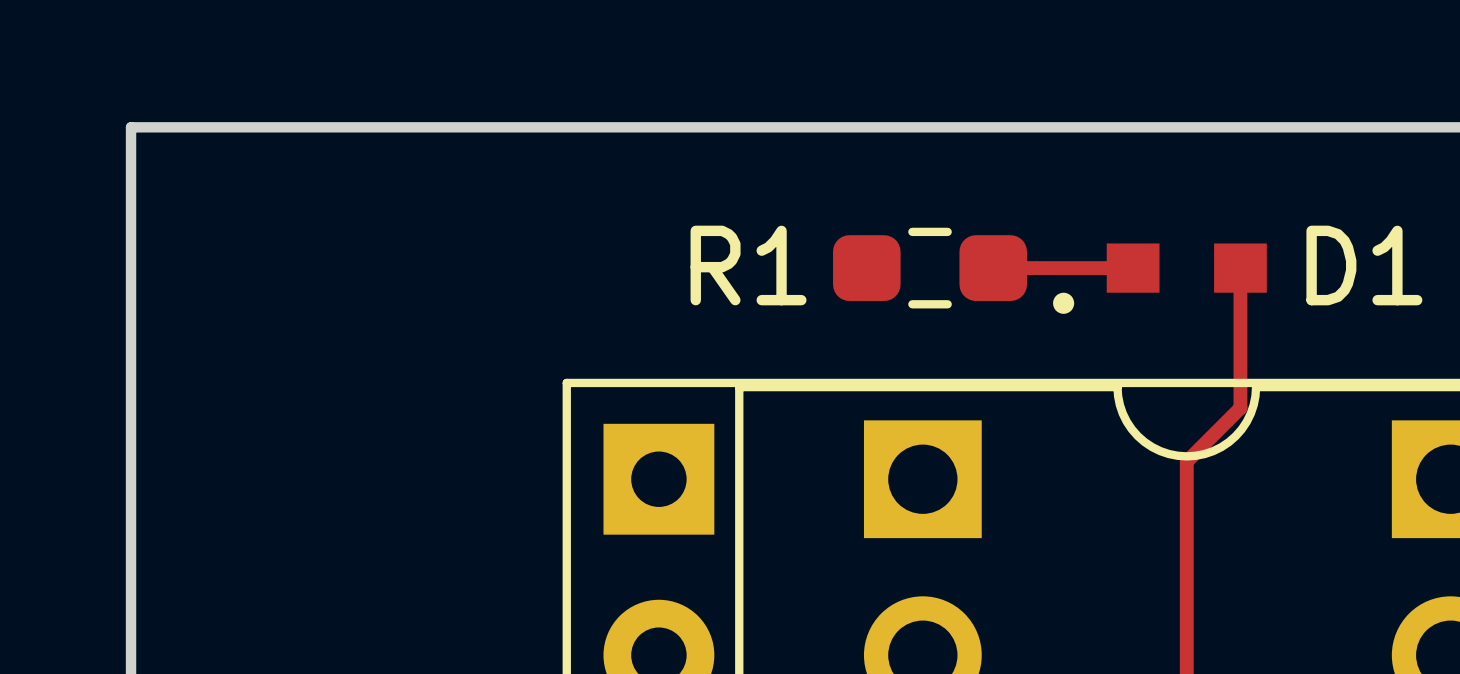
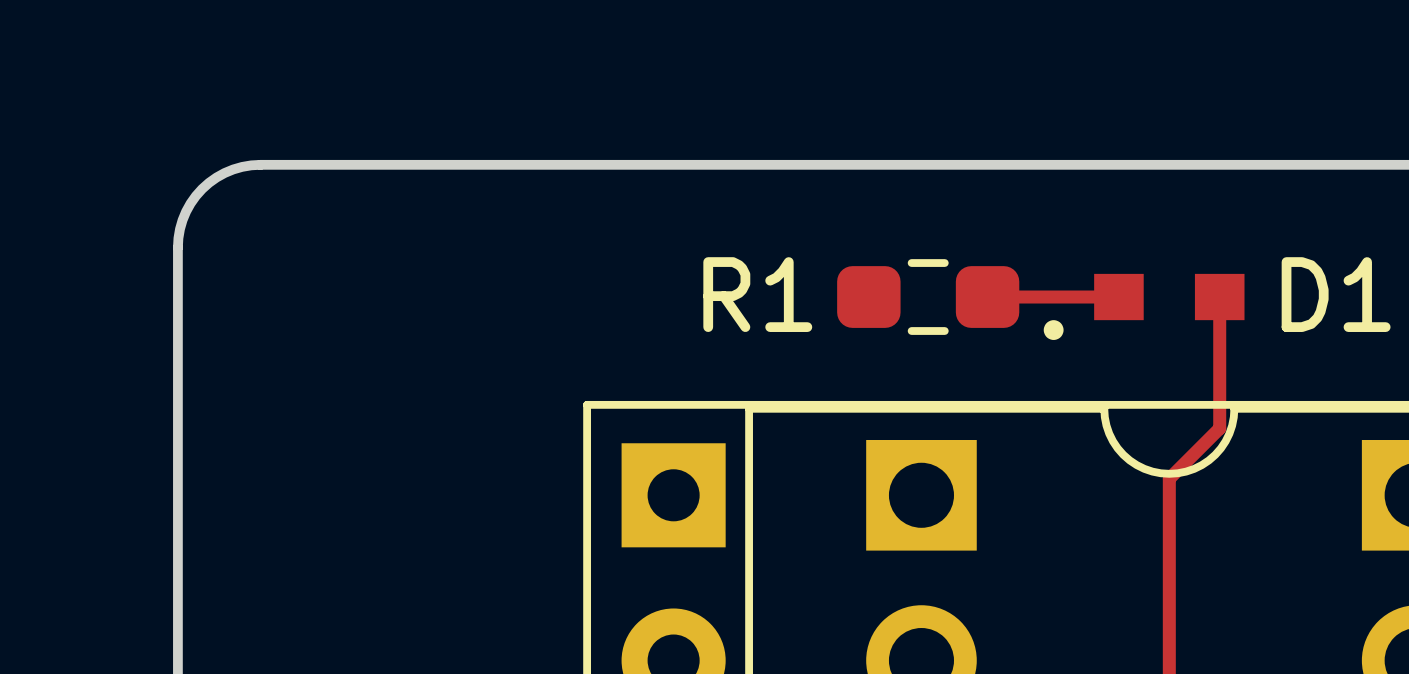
board edge: (219, 127) (131, 127) (131, 215) -> (260, 164) (233, 169) (216, 177) (202, 189) (186, 211) (179, 229) (177, 247)

